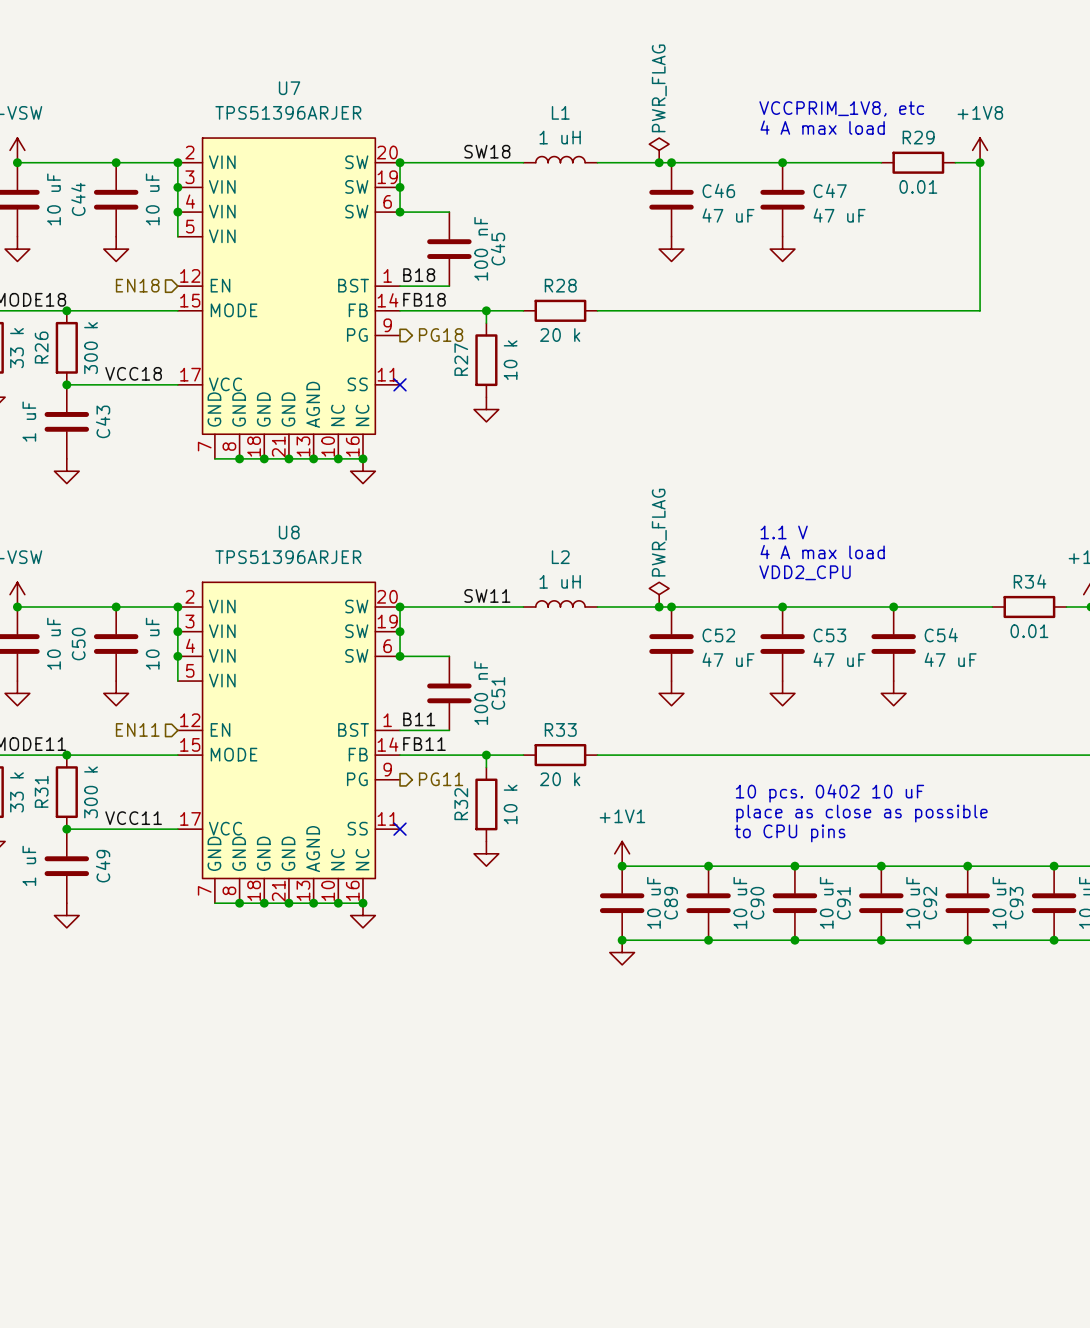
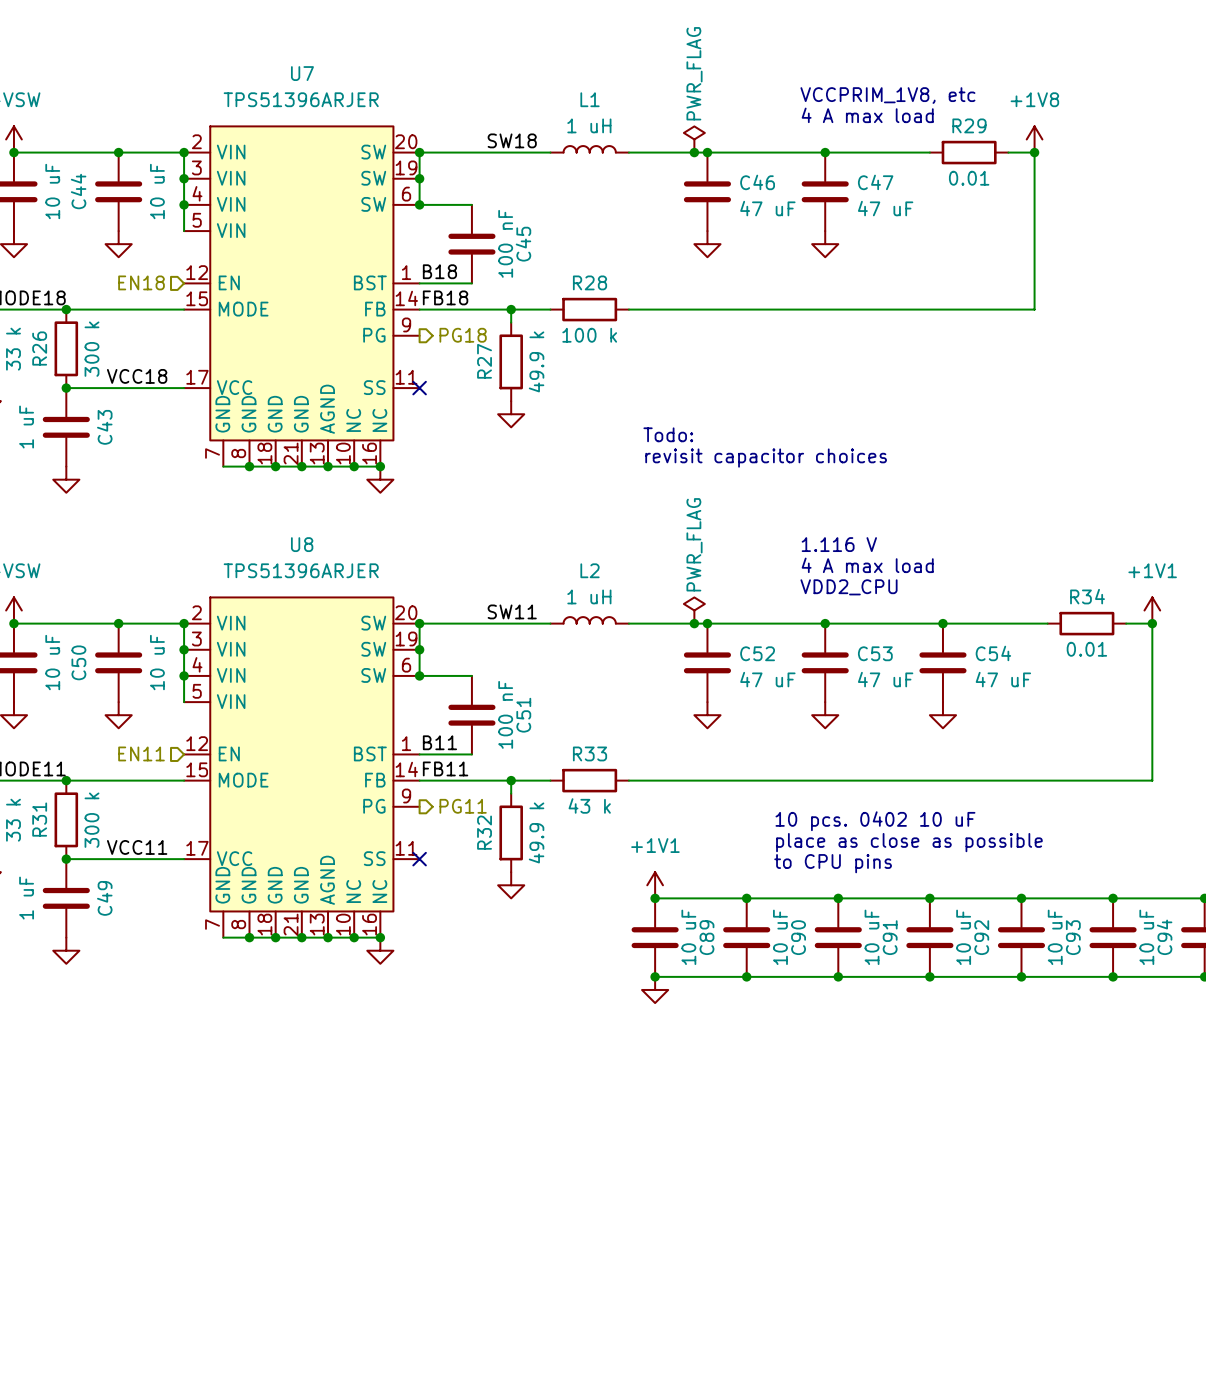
R28 value: 20 k (560, 335) -> 100 k (589, 335)
R27 value: 10 k (510, 360) -> 49.9 k (536, 361)
text: none -> Todo: (668, 434)
text: none -> revisit capacitor choices (766, 458)
text: 1.1 V (784, 532) -> 1.116 V (839, 544)
R33 value: 20 k (560, 779) -> 43 k (589, 805)
R32 value: 10 k (510, 804) -> 49.9 k (536, 832)

